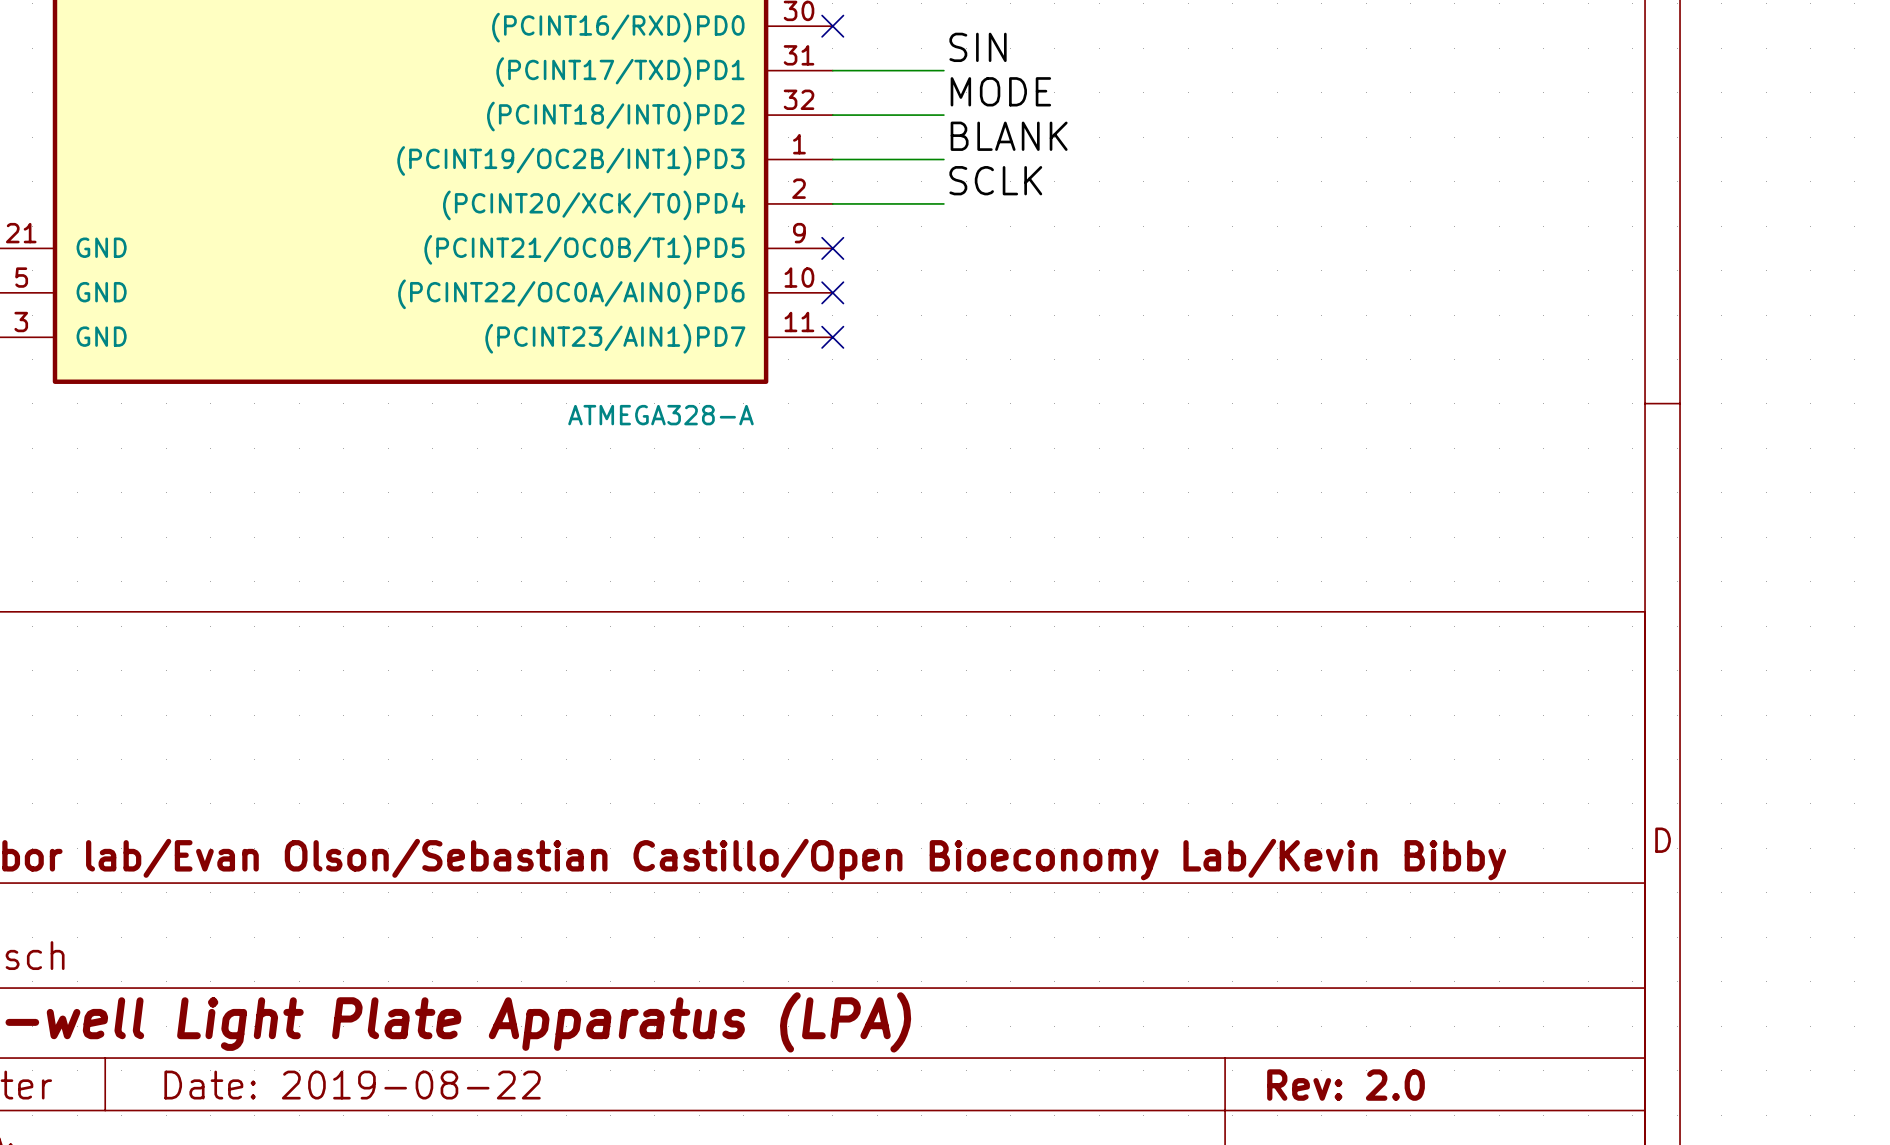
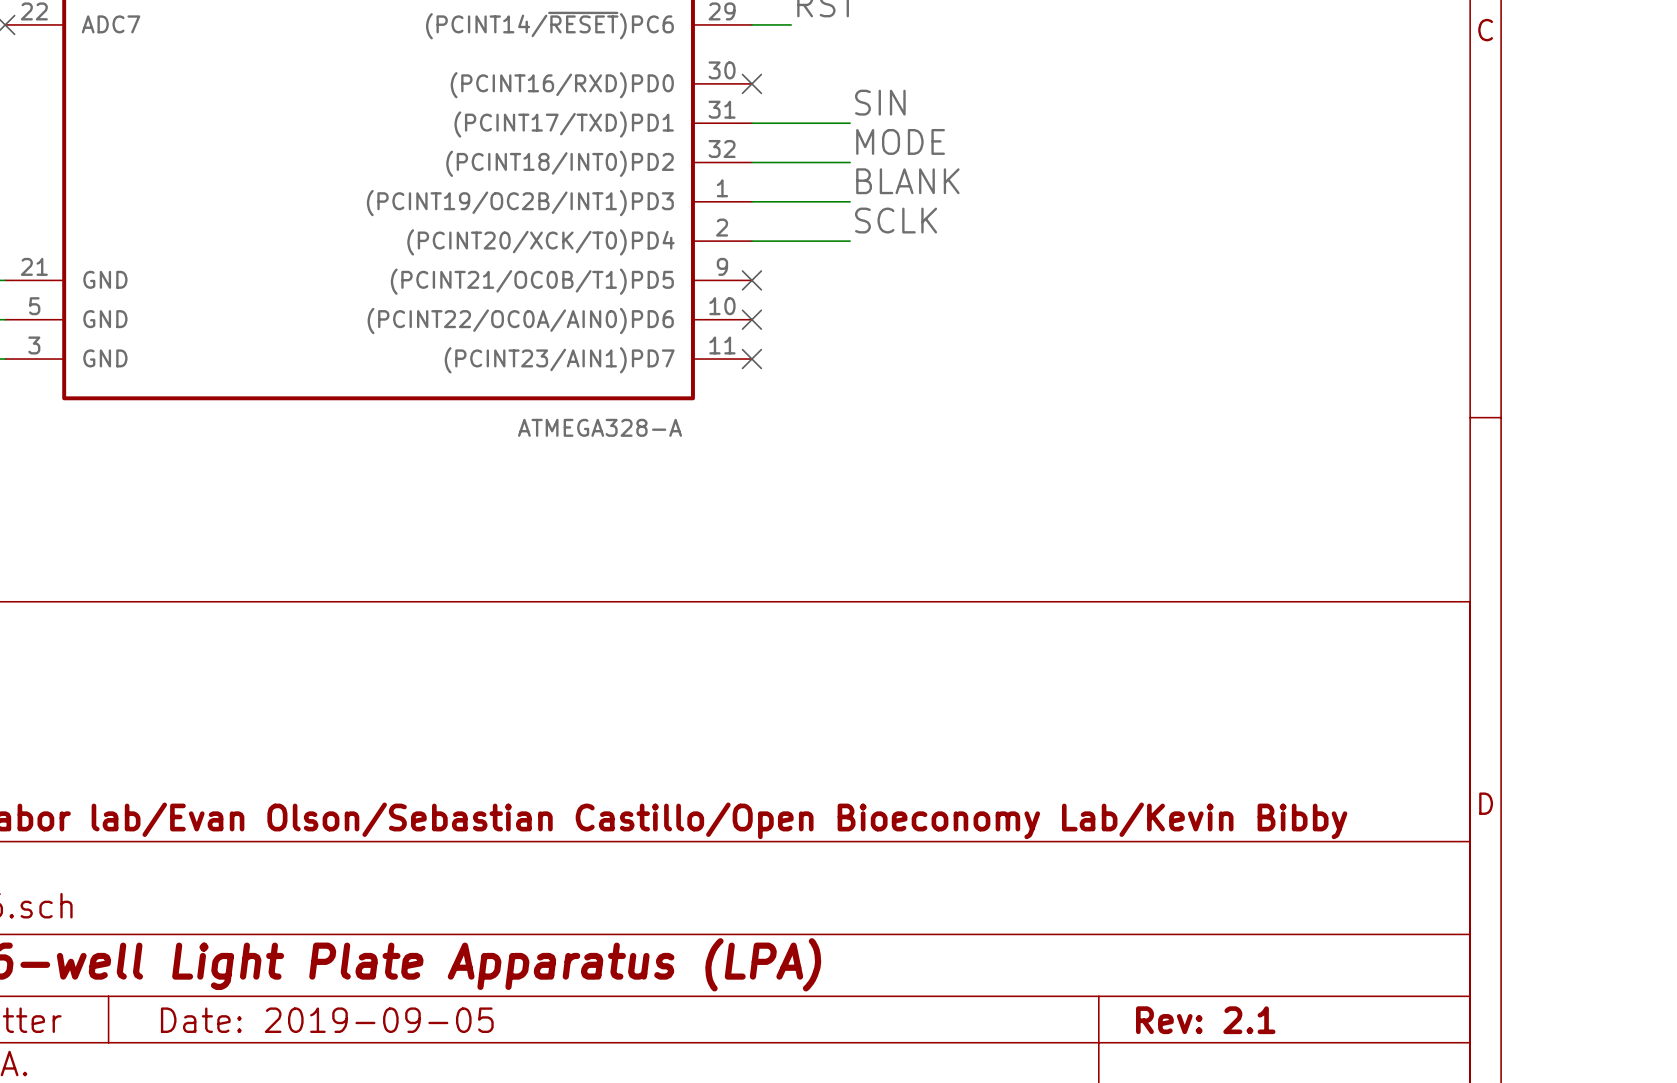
title block: Date: 2019-08-22 (352, 1085) -> Date: 2019-09-05 (327, 1020)
title block: Rev: 2.0 (1346, 1085) -> Rev: 2.1 (1205, 1020)

